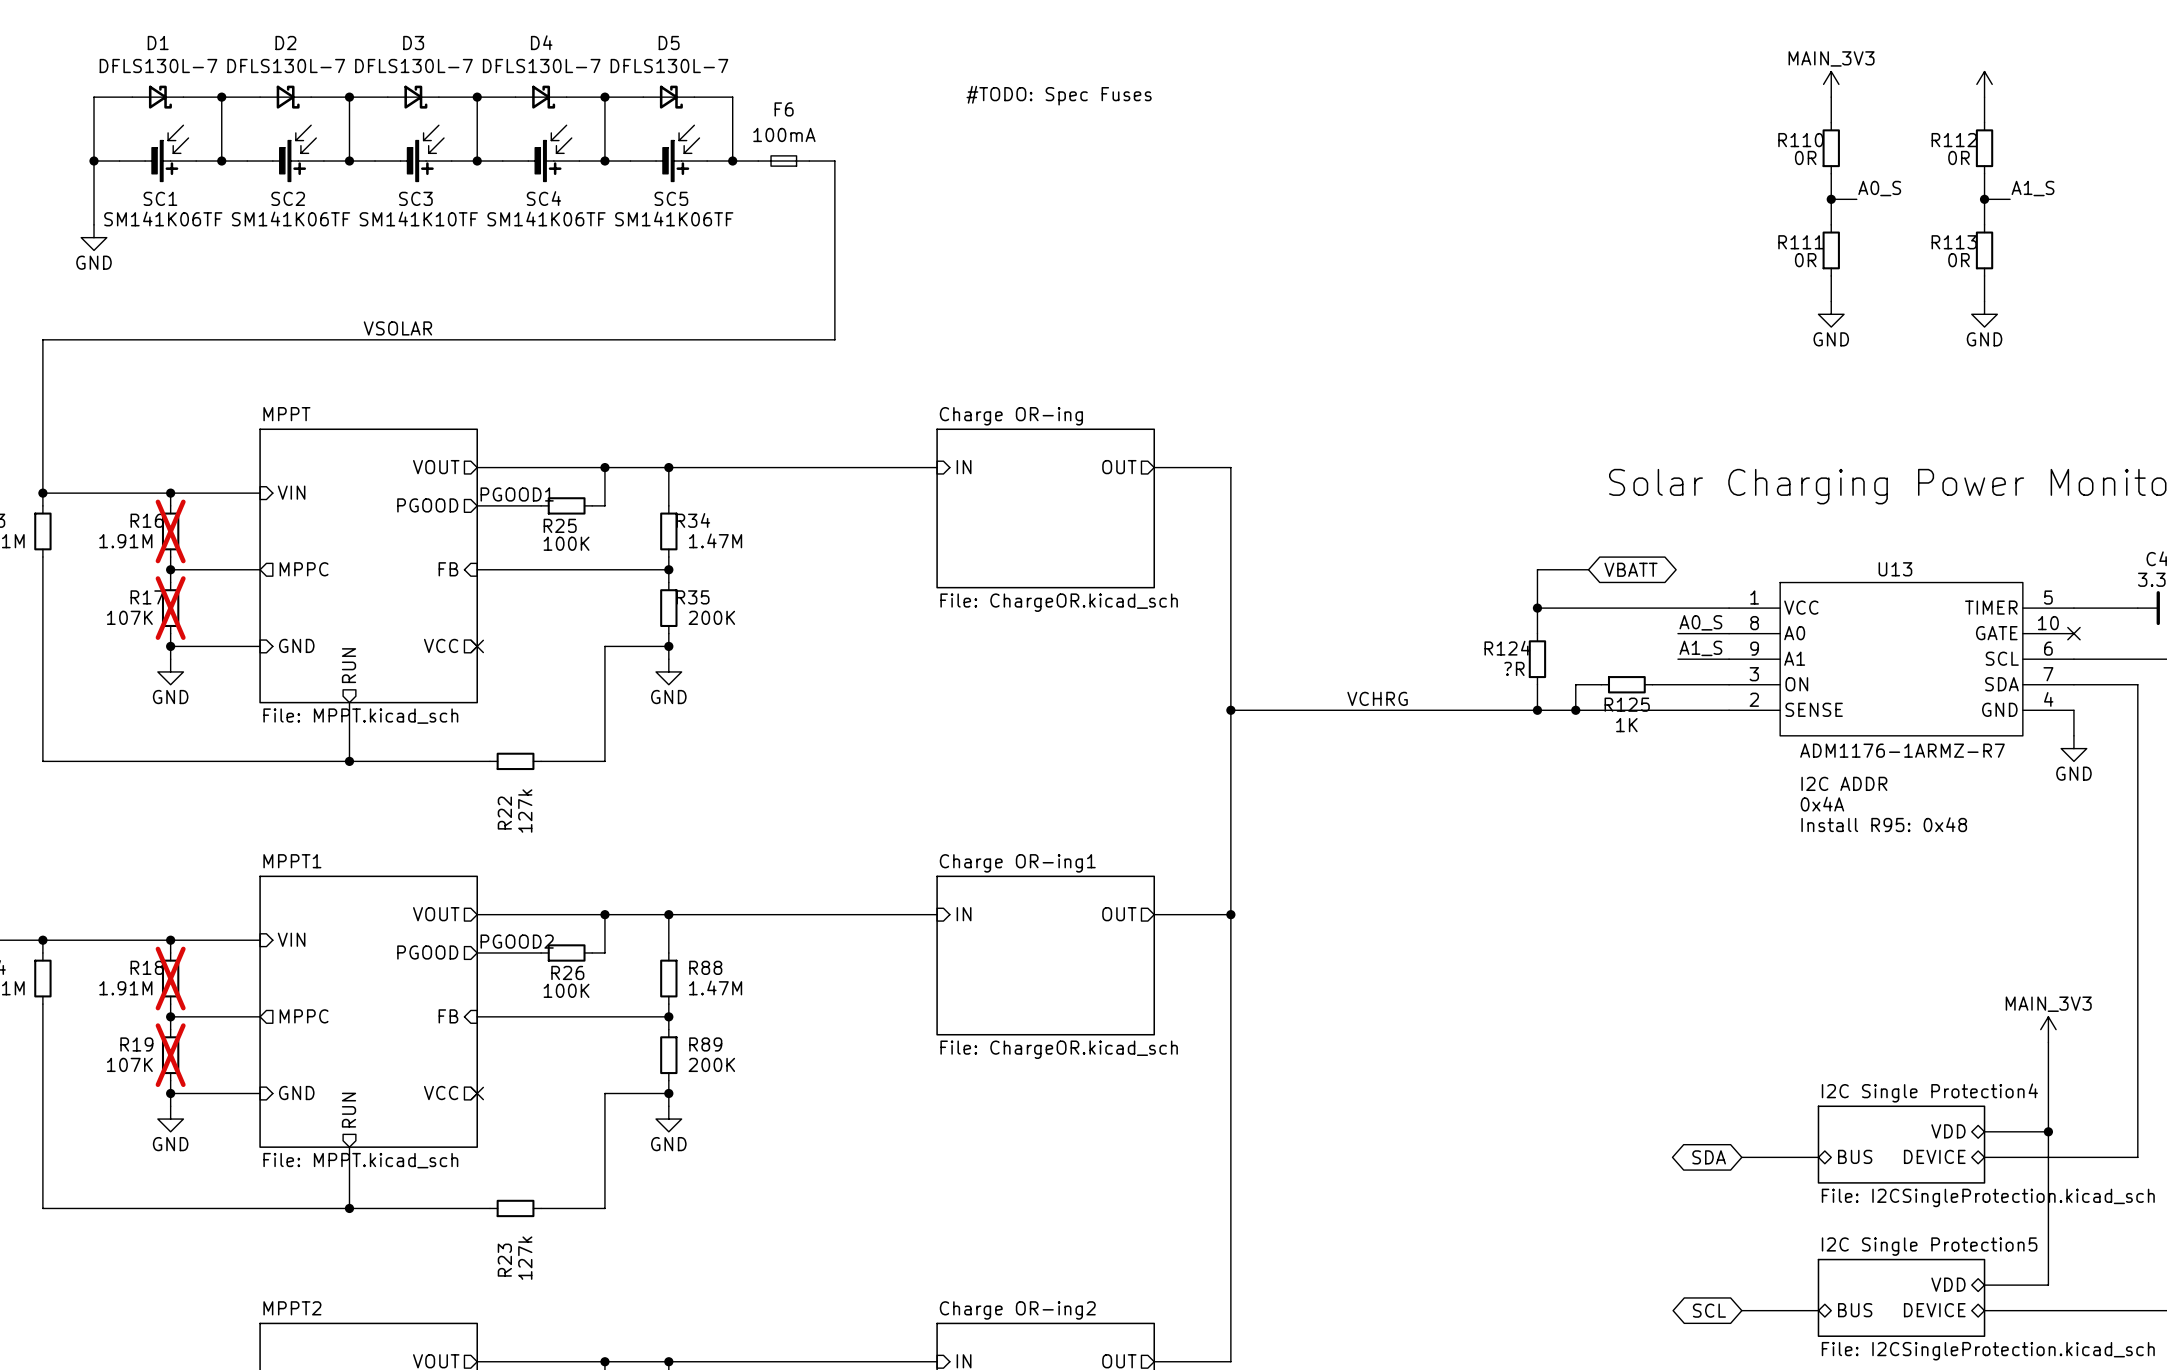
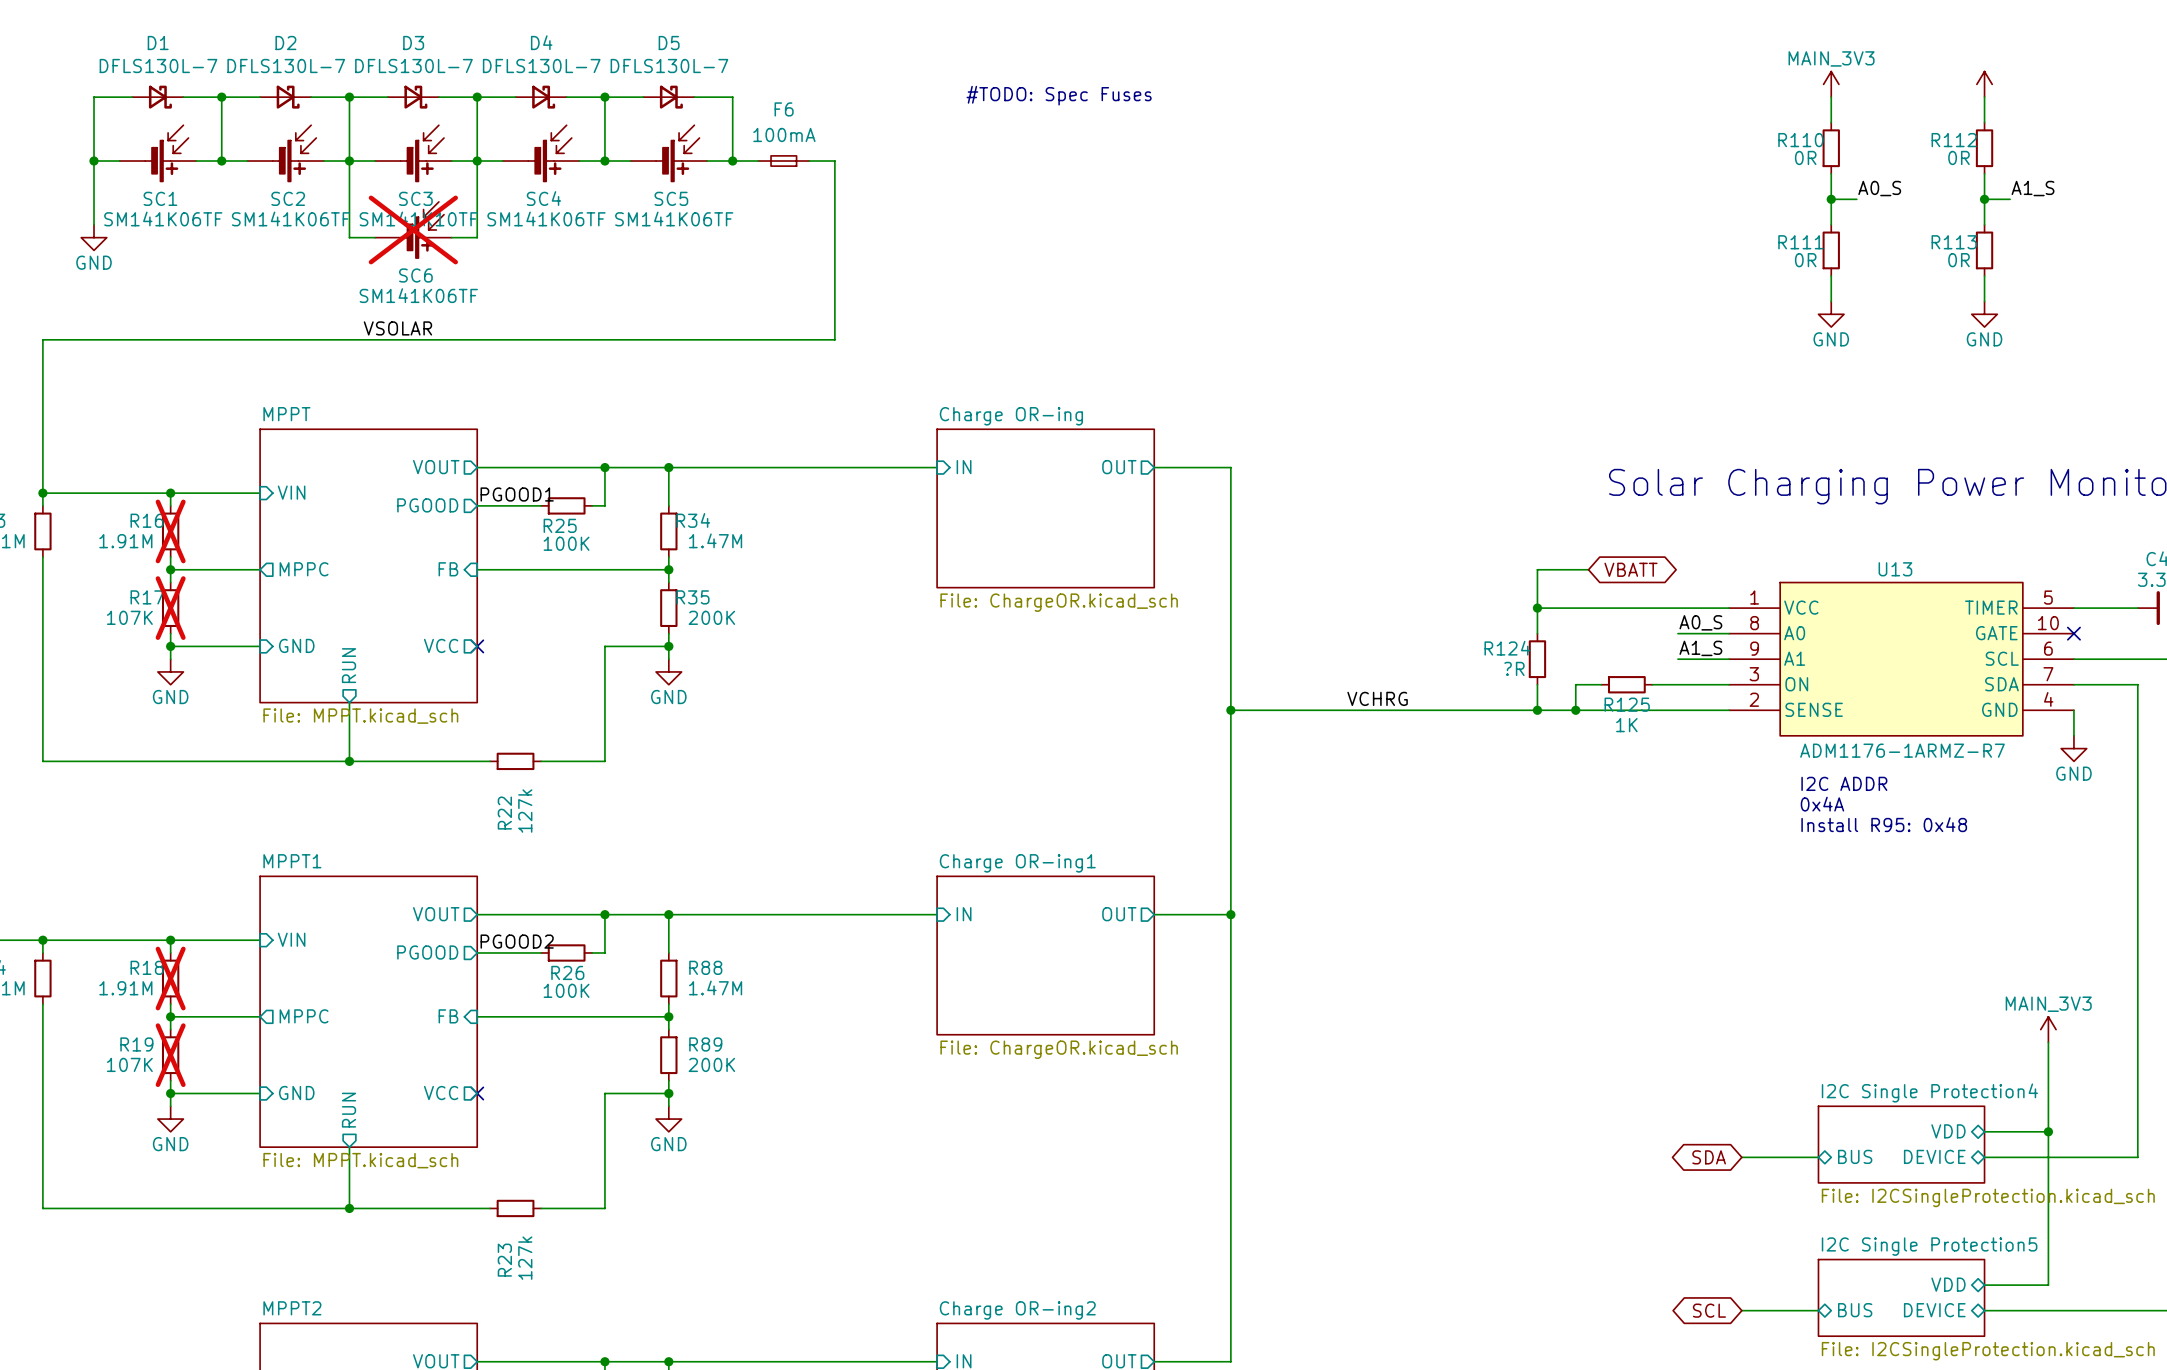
wire: none -> (349, 161) (349, 237) (375, 237)
wire: none -> (477, 161) (477, 237) (451, 237)
SC6: none -> SM141K06TF (413, 229)

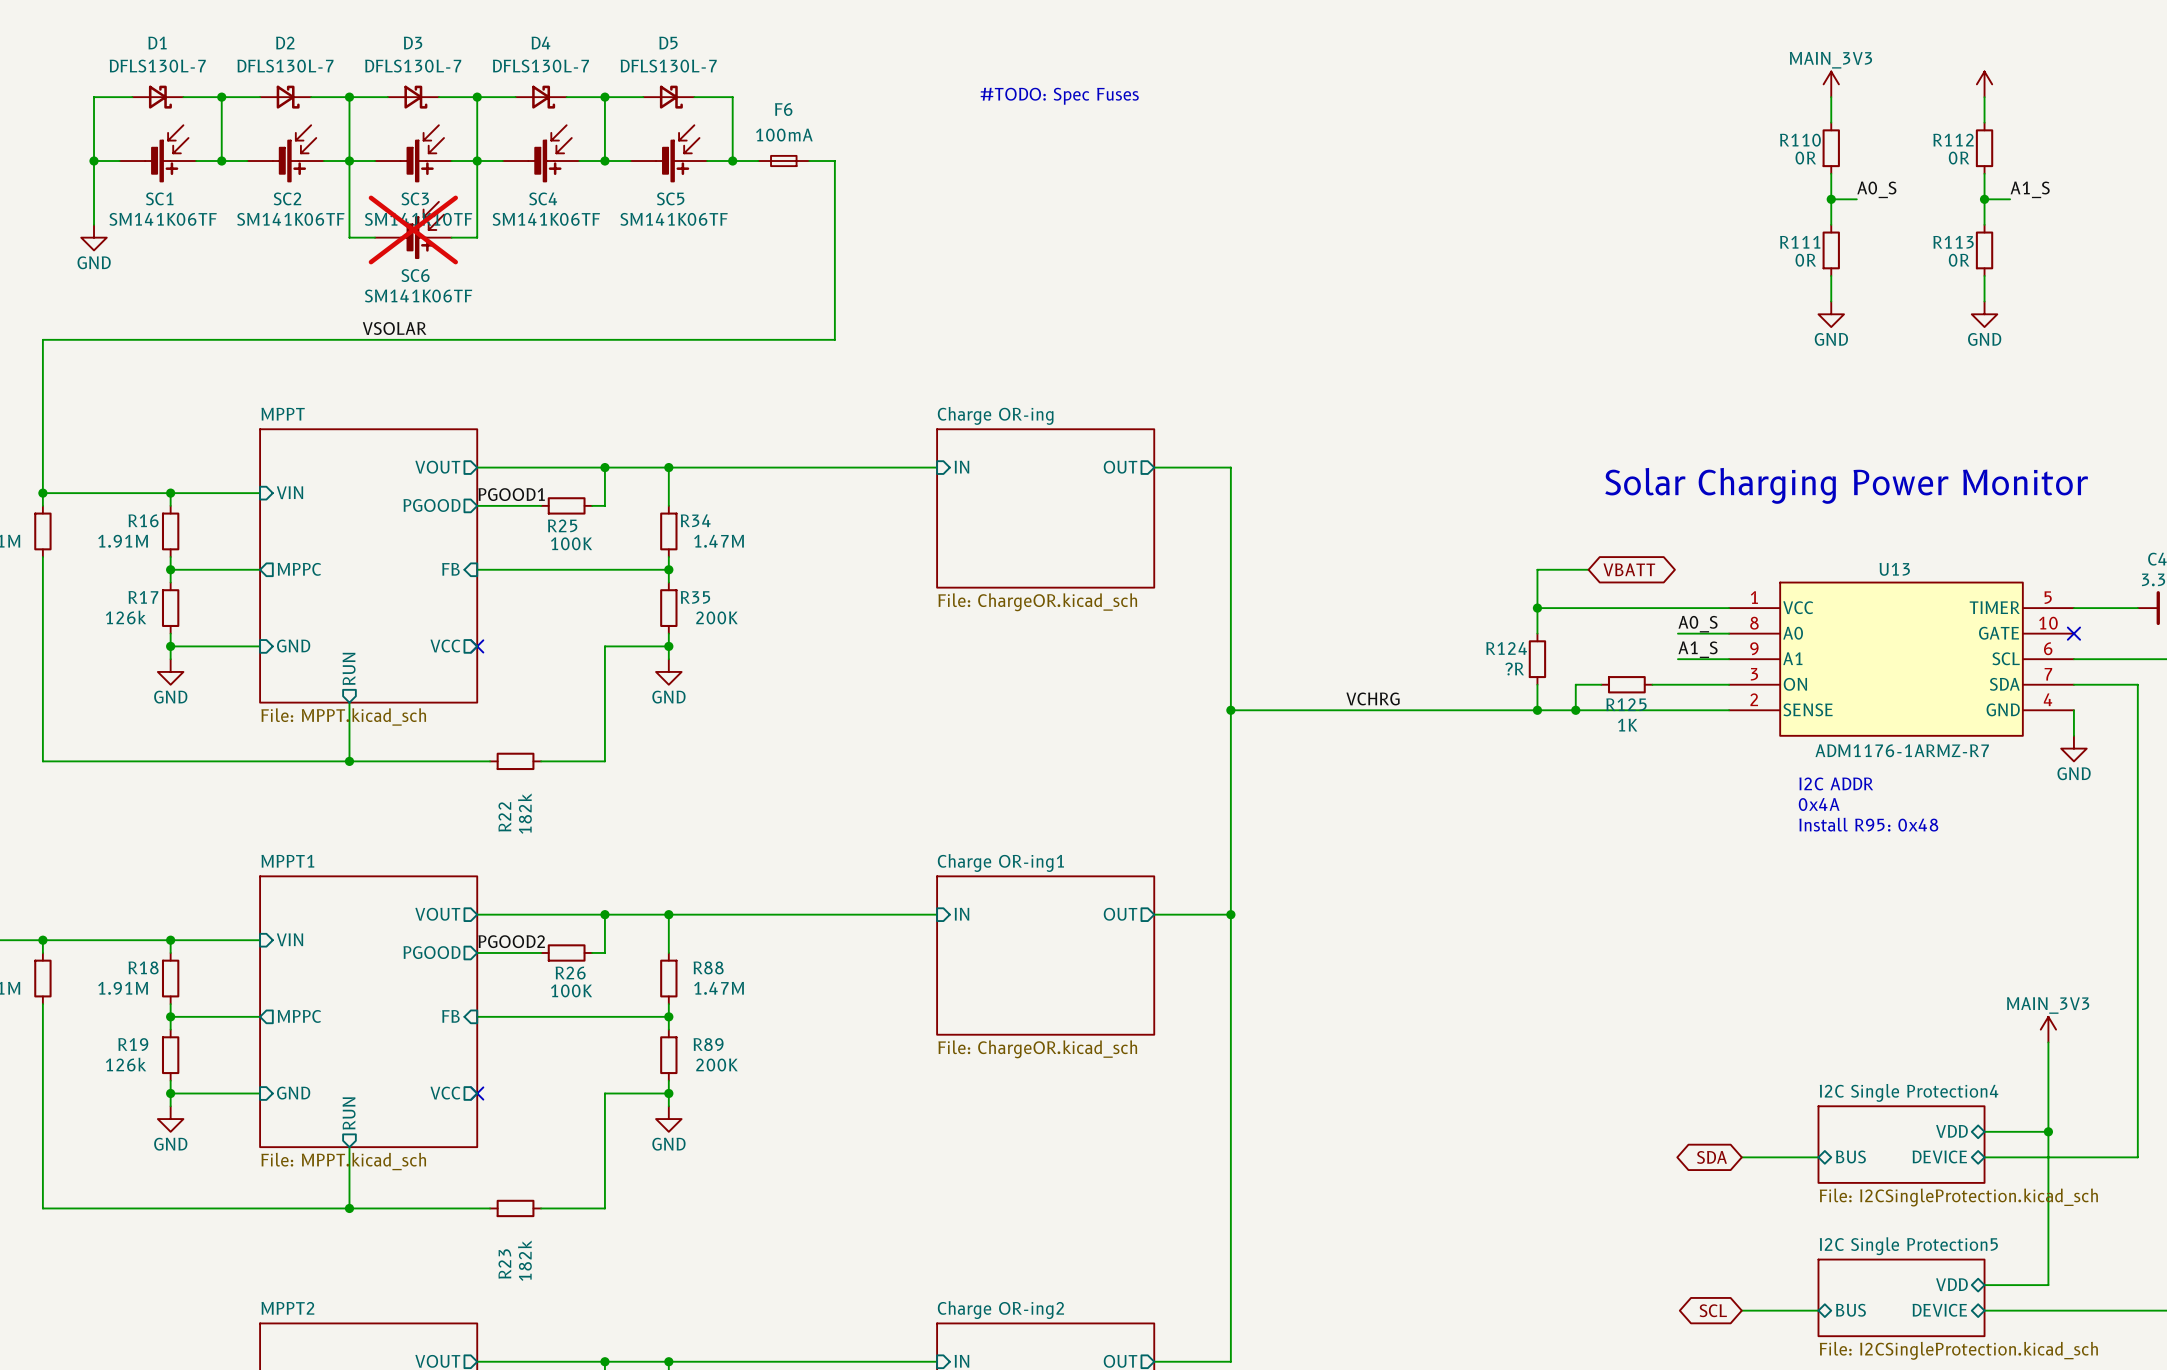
R16 do-not-place cross: (170, 531) -> none
R17 do-not-place cross: (170, 608) -> none
R17 value: 107K (129, 617) -> 126k (126, 617)
R22 value: 127k (525, 811) -> 182k (524, 813)
R18 do-not-place cross: (170, 978) -> none
R19 do-not-place cross: (170, 1055) -> none
R19 value: 107K (129, 1064) -> 126k (126, 1064)
R23 value: 127k (525, 1258) -> 182k (524, 1260)

